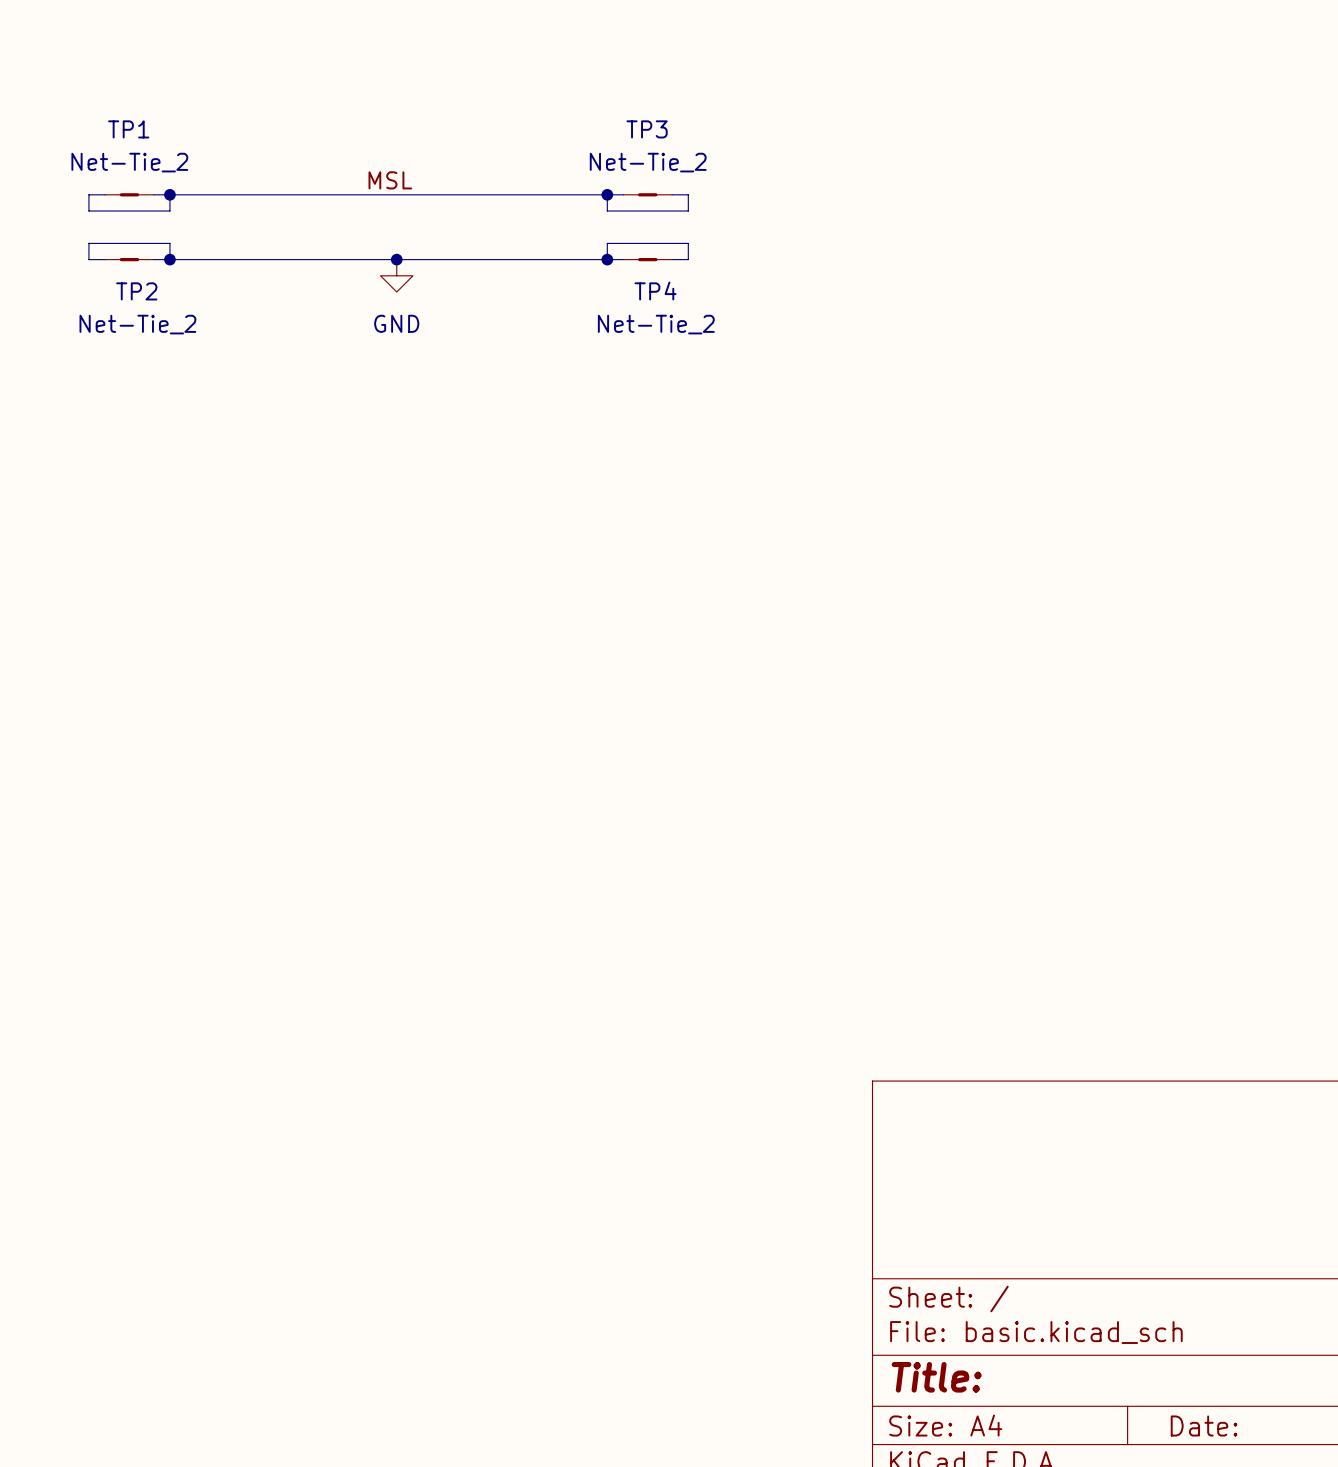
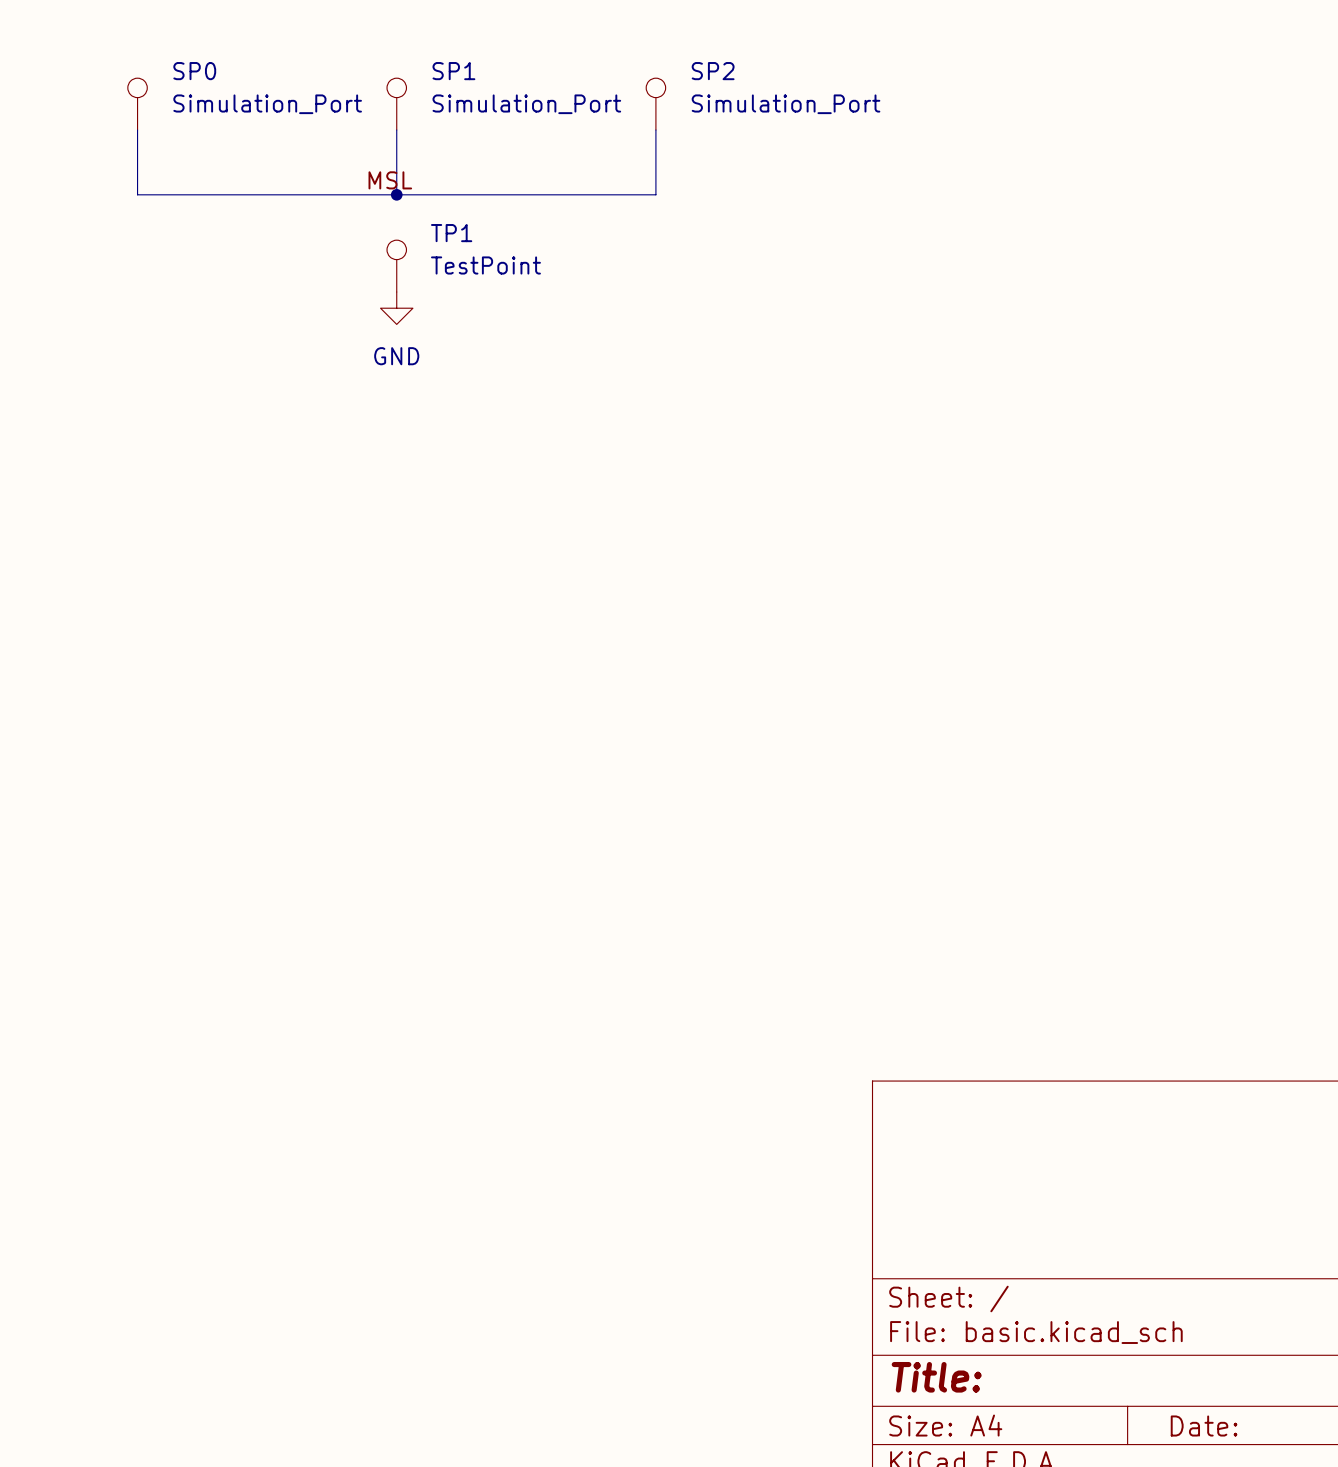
SP0: none -> Simulation_Port (137, 104)
SP1: none -> Simulation_Port (396, 104)
SP2: none -> Simulation_Port (655, 104)
TP1 name position: TP1 (128, 129) -> TP1 (451, 233)
wire: none -> (137, 130) (137, 194) (153, 194)
wire: none -> (396, 130) (396, 194)
wire: none -> (655, 130) (655, 194) (623, 194)
TP1 value: Net-Tie_2 (129, 162) -> TestPoint (485, 265)
TP1 symbol: [105, 193, 154, 197] -> [387, 240, 407, 293]
wire: (105, 194) (88, 194) (88, 211) (169, 211) (169, 194) -> none
junction: (169, 194) -> none
wire: (607, 194) (607, 211) (688, 211) (688, 194) (672, 194) -> none
junction: (607, 194) -> none
TP3: Net-Tie_2 (647, 194) -> none
wire: (105, 259) (88, 259) (88, 243) (169, 243) (169, 259) -> none
TP2: Net-Tie_2 (129, 259) -> none
wire: (153, 259) (623, 259) -> none
junction: (169, 259) -> none
junction position: (396, 259) -> (396, 194)
wire: (607, 259) (607, 243) (688, 243) (688, 259) (672, 259) -> none
junction: (607, 259) -> none
TP4: Net-Tie_2 (647, 259) -> none
power symbol position: GND (396, 275) -> GND (396, 308)

